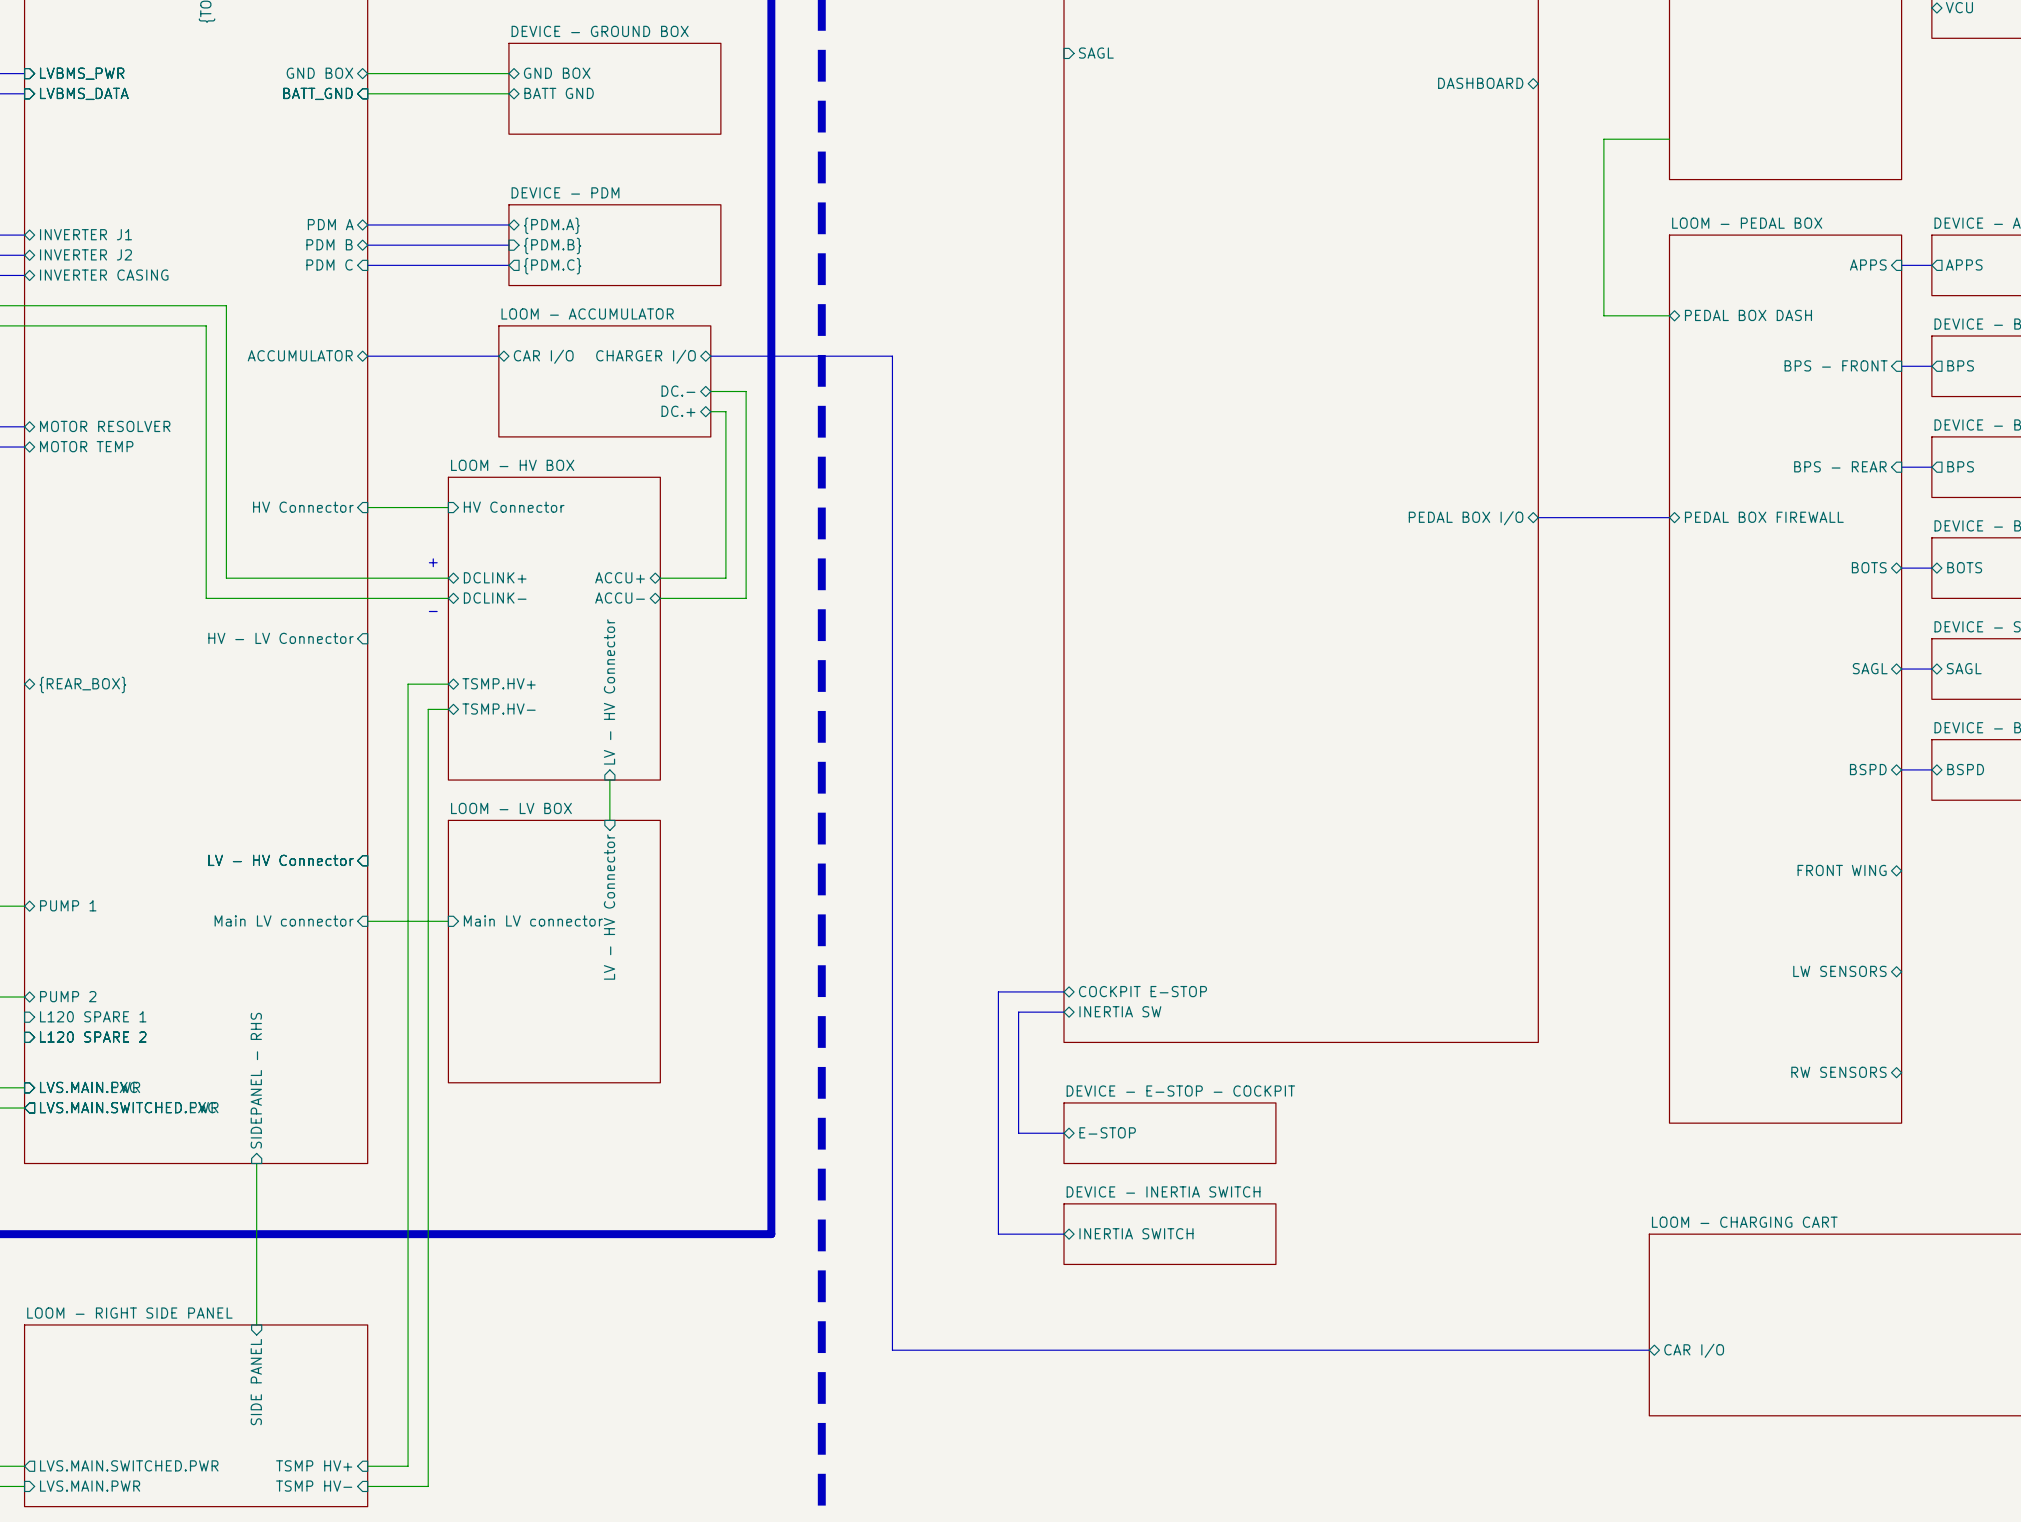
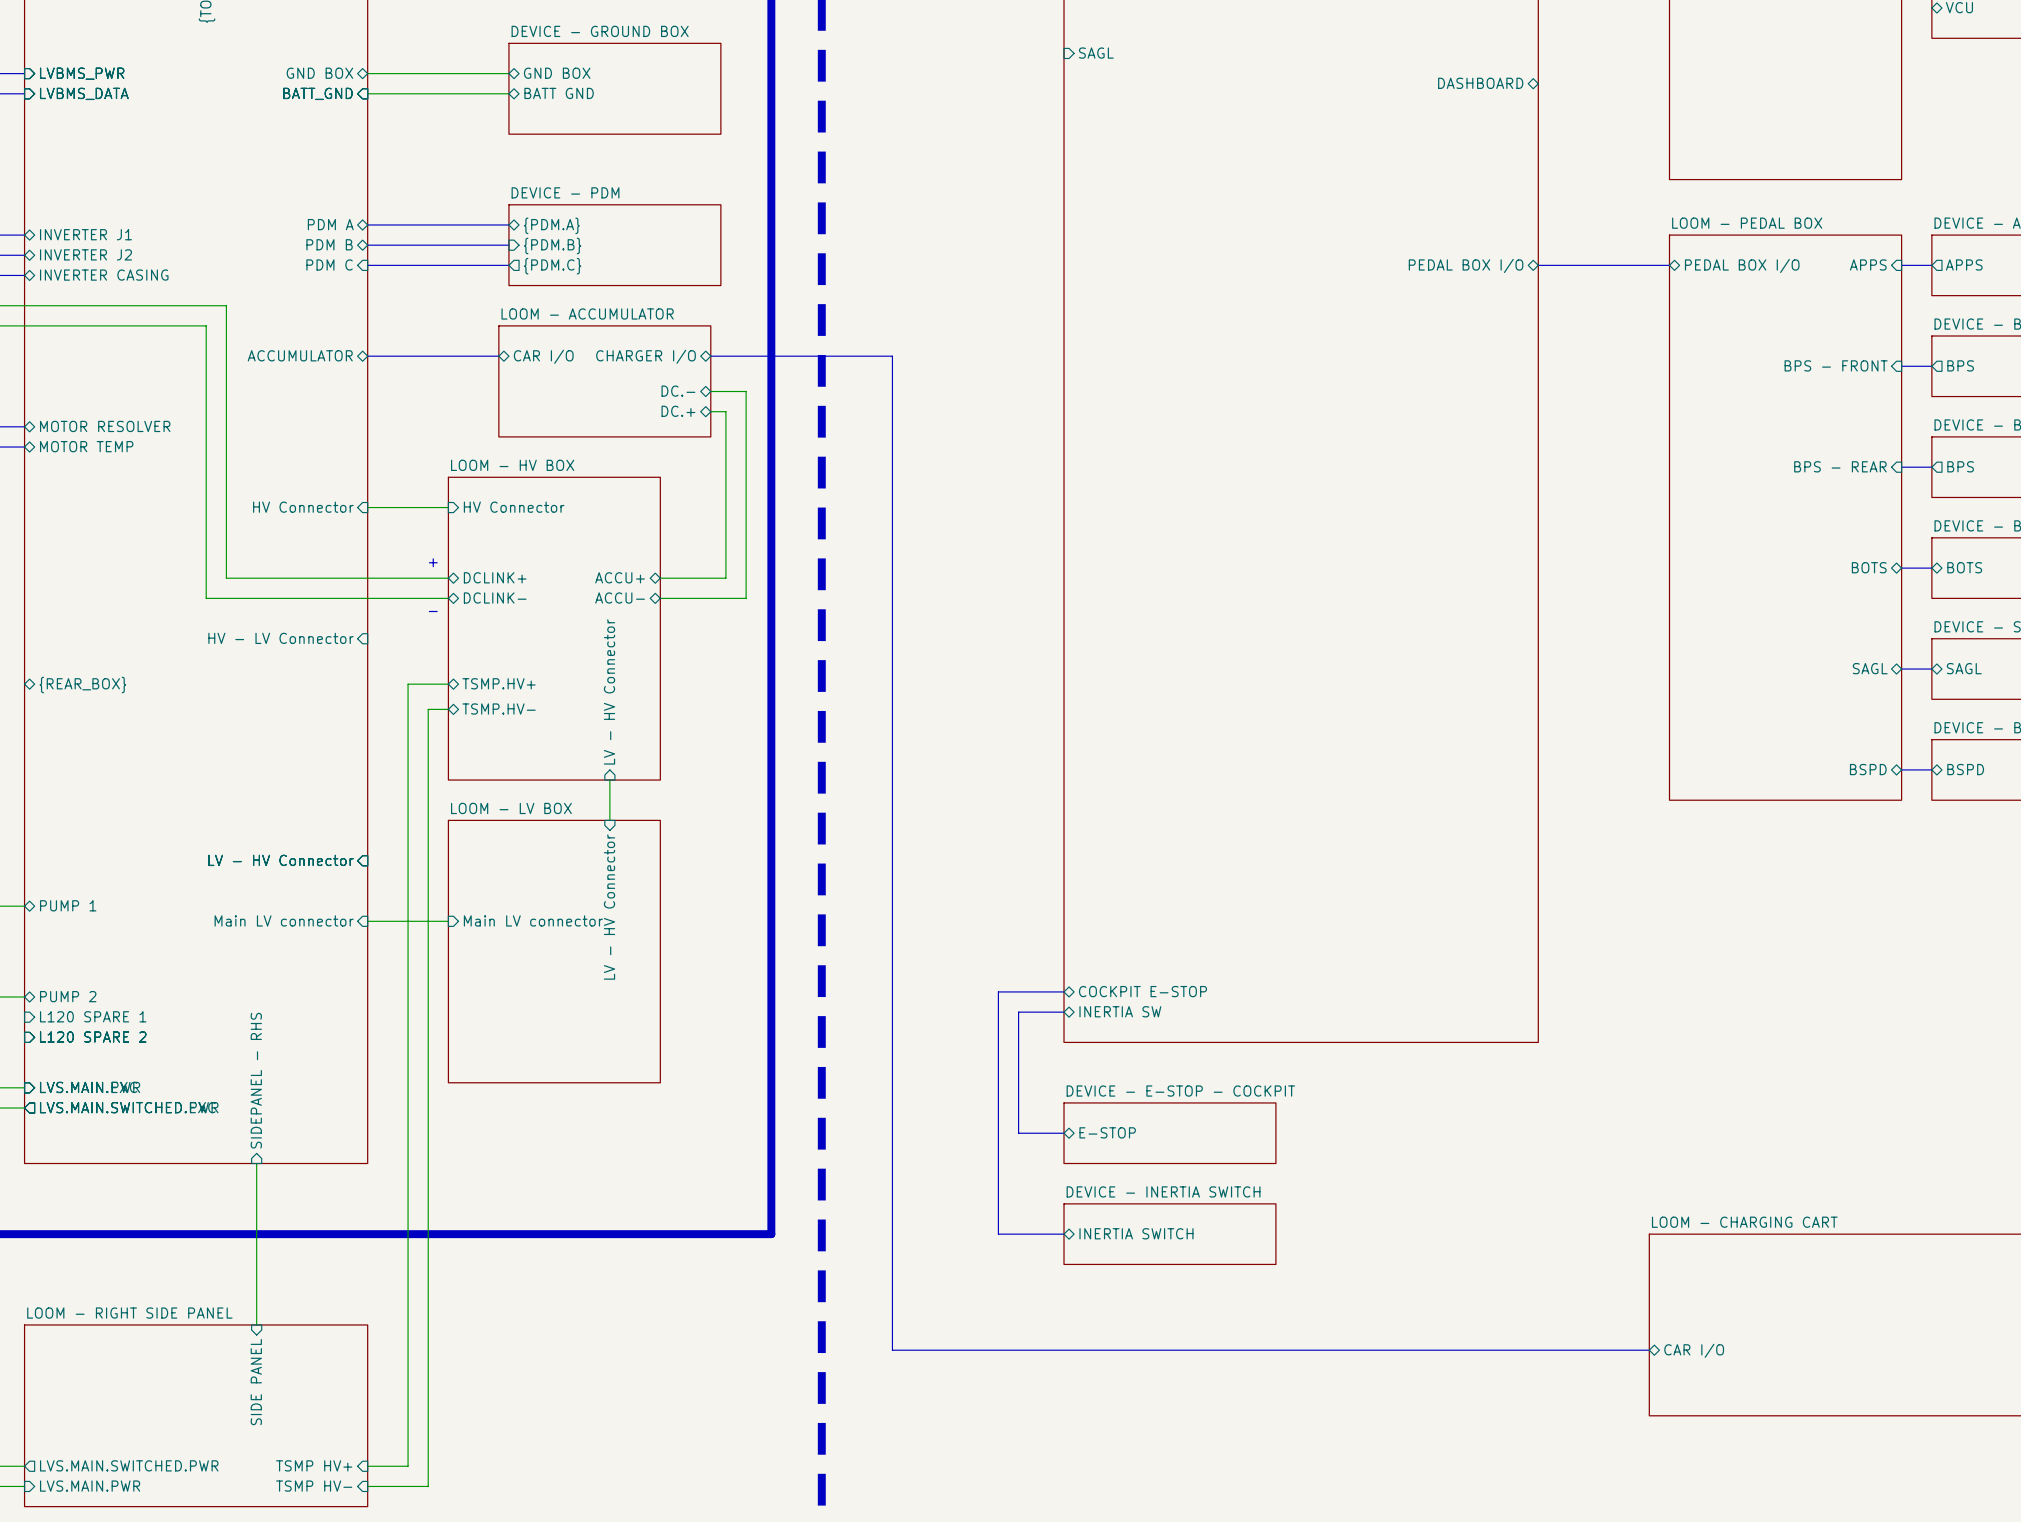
wire: (1669, 139) (1603, 139) (1603, 315) (1669, 315) -> none
sheet pin: none -> PEDAL BOX I/O (1466, 265)
bus: none -> (1538, 265) (1669, 265)
sheet pin: none -> PEDAL BOX I/O (1742, 265)
sheet pin: PEDAL BOX DASH (1748, 315) -> none
bus: (1538, 517) (1669, 517) -> none
sheet pin: PEDAL BOX FIREWALL (1764, 517) -> none
sheet LOOM - PEDAL BOX: none -> (1785, 517)
sheet pin: PEDAL BOX I/O (1466, 518) -> none
sheet LOOM - PEDAL BOX: (1785, 679) -> none
sheet pin: FRONT WING (1842, 870) -> none
sheet pin: LW SENSORS (1839, 971) -> none
sheet pin: RW SENSORS (1838, 1072) -> none

